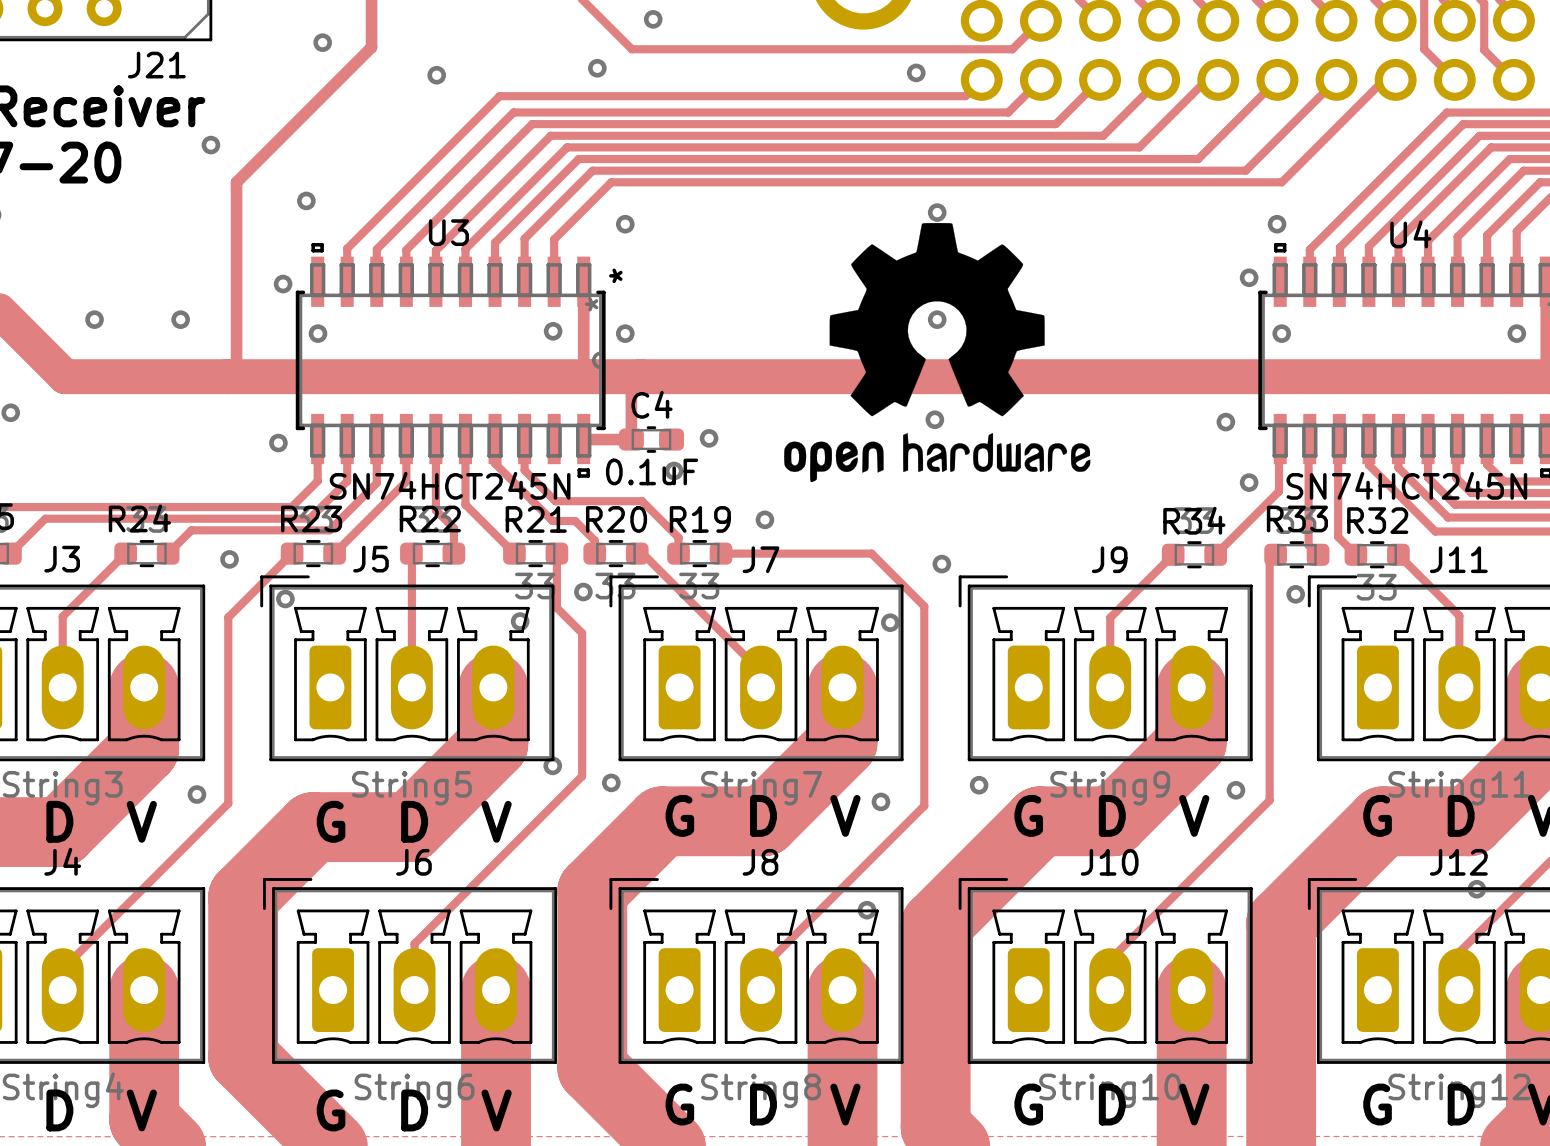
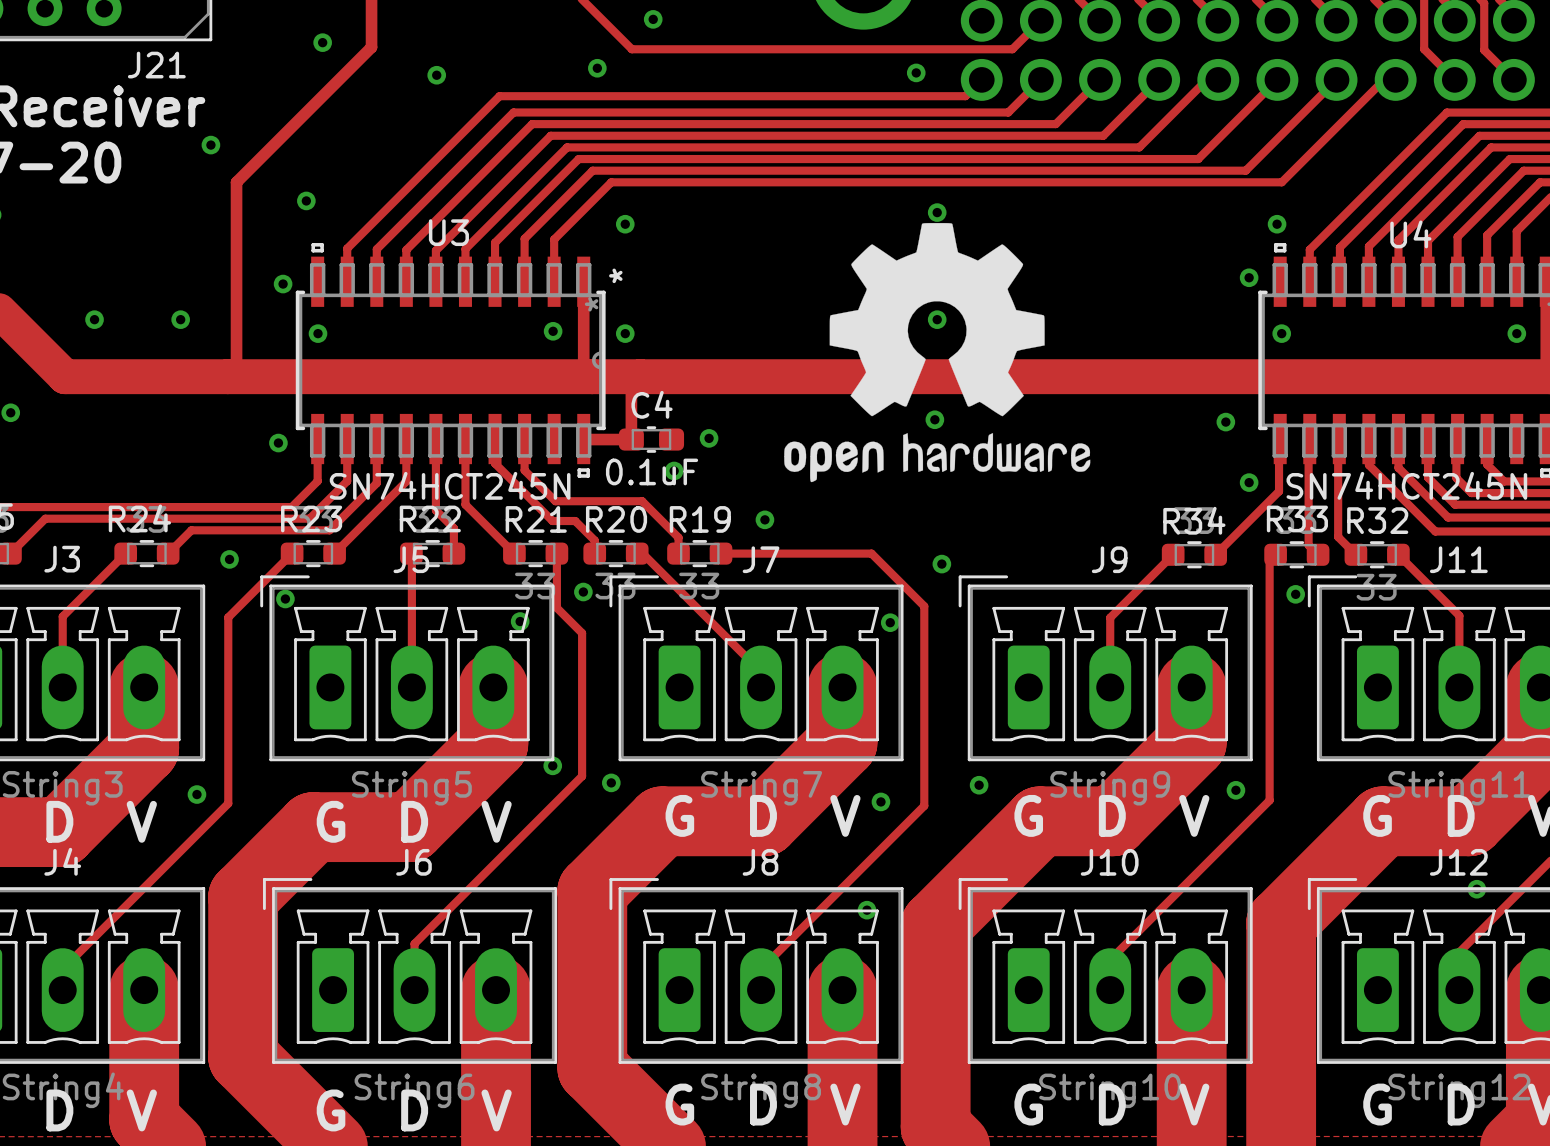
J5 name position: J5 (370, 559) -> J5 (411, 559)

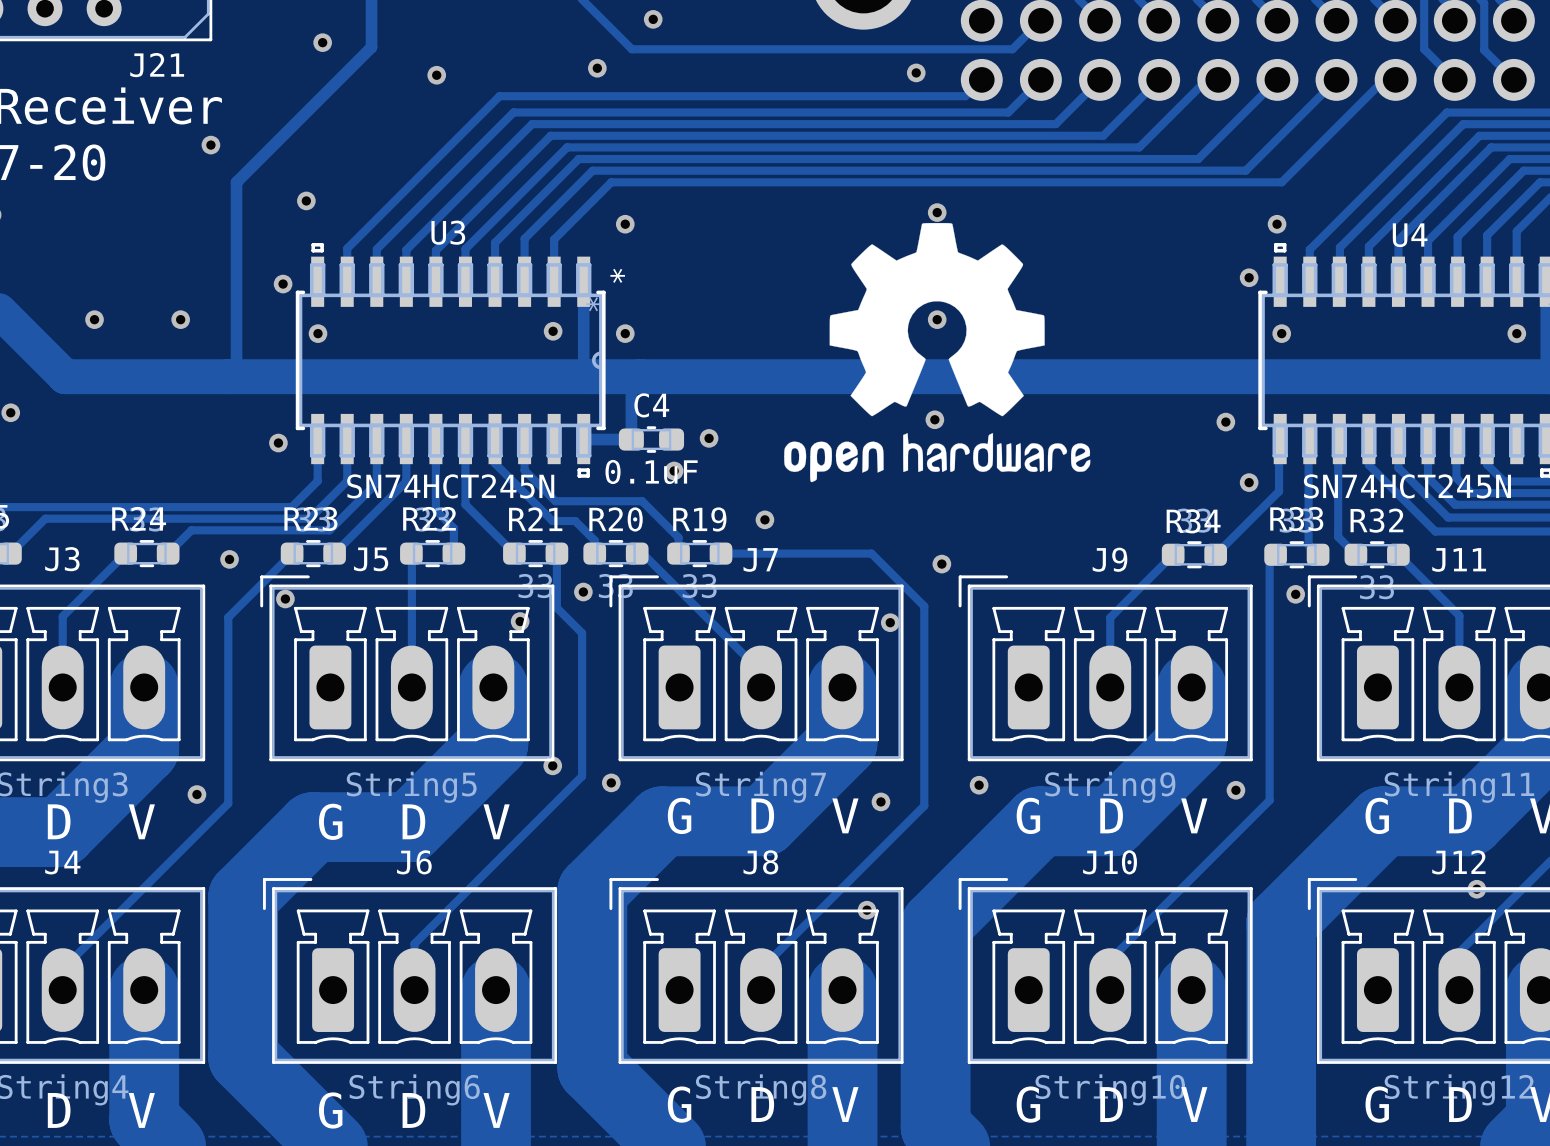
J5 name position: J5 (411, 559) -> J5 (371, 559)

